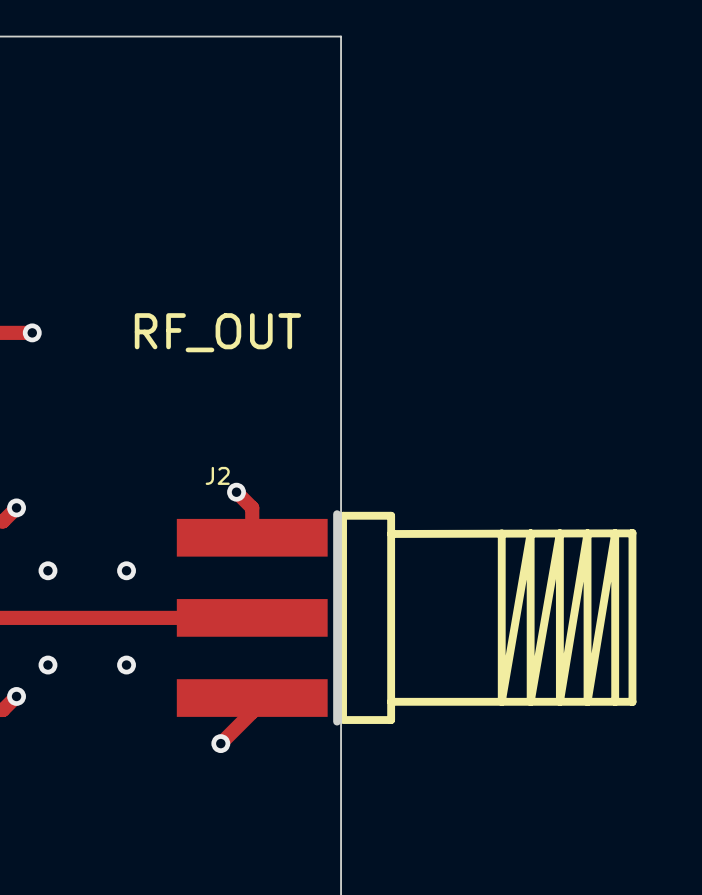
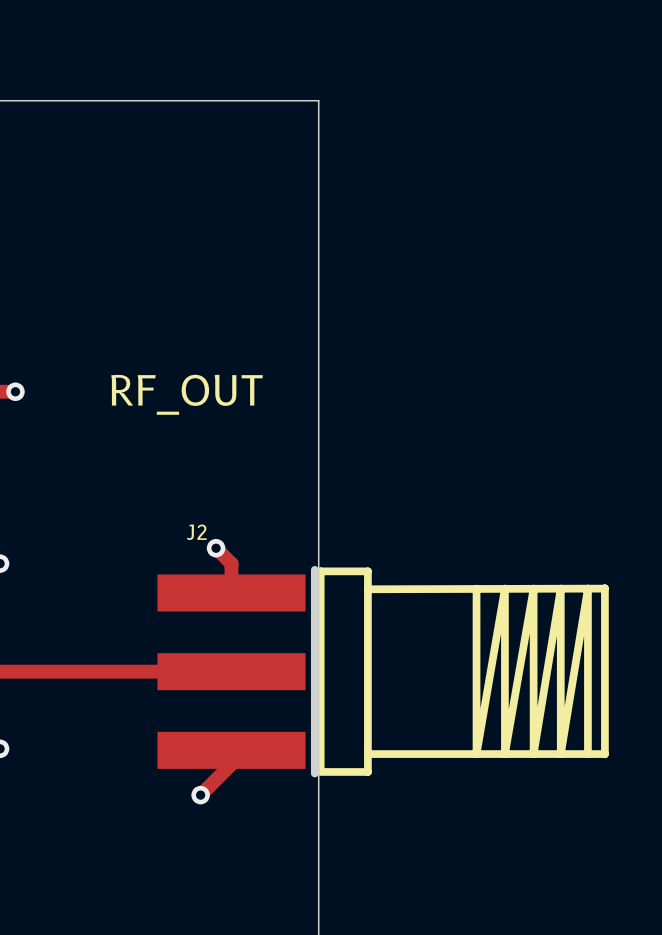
via: (47, 570) -> none
via: (126, 570) -> none
via: (47, 665) -> none
via: (126, 665) -> none

